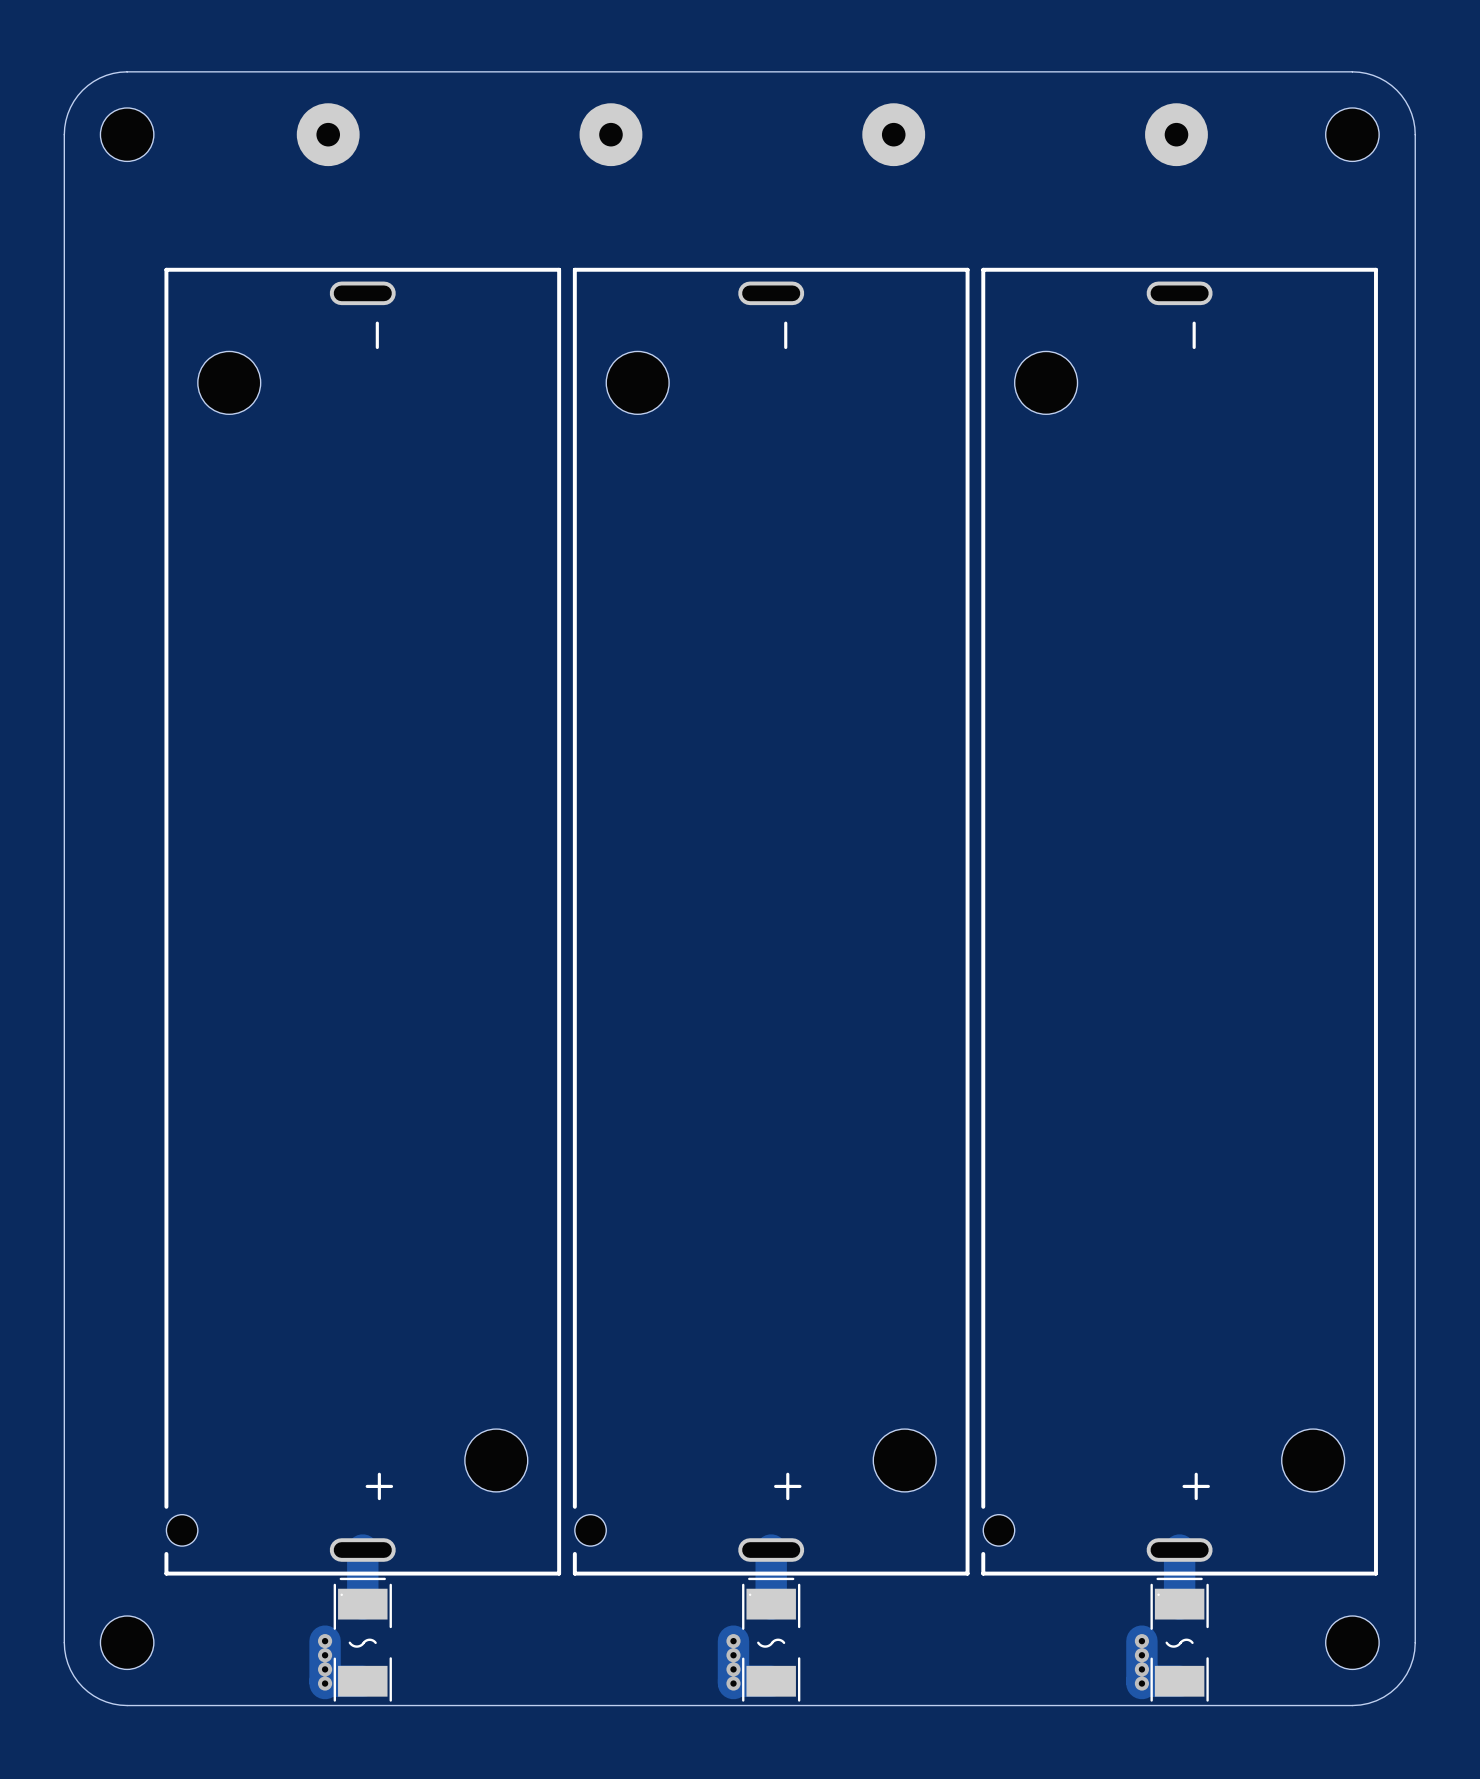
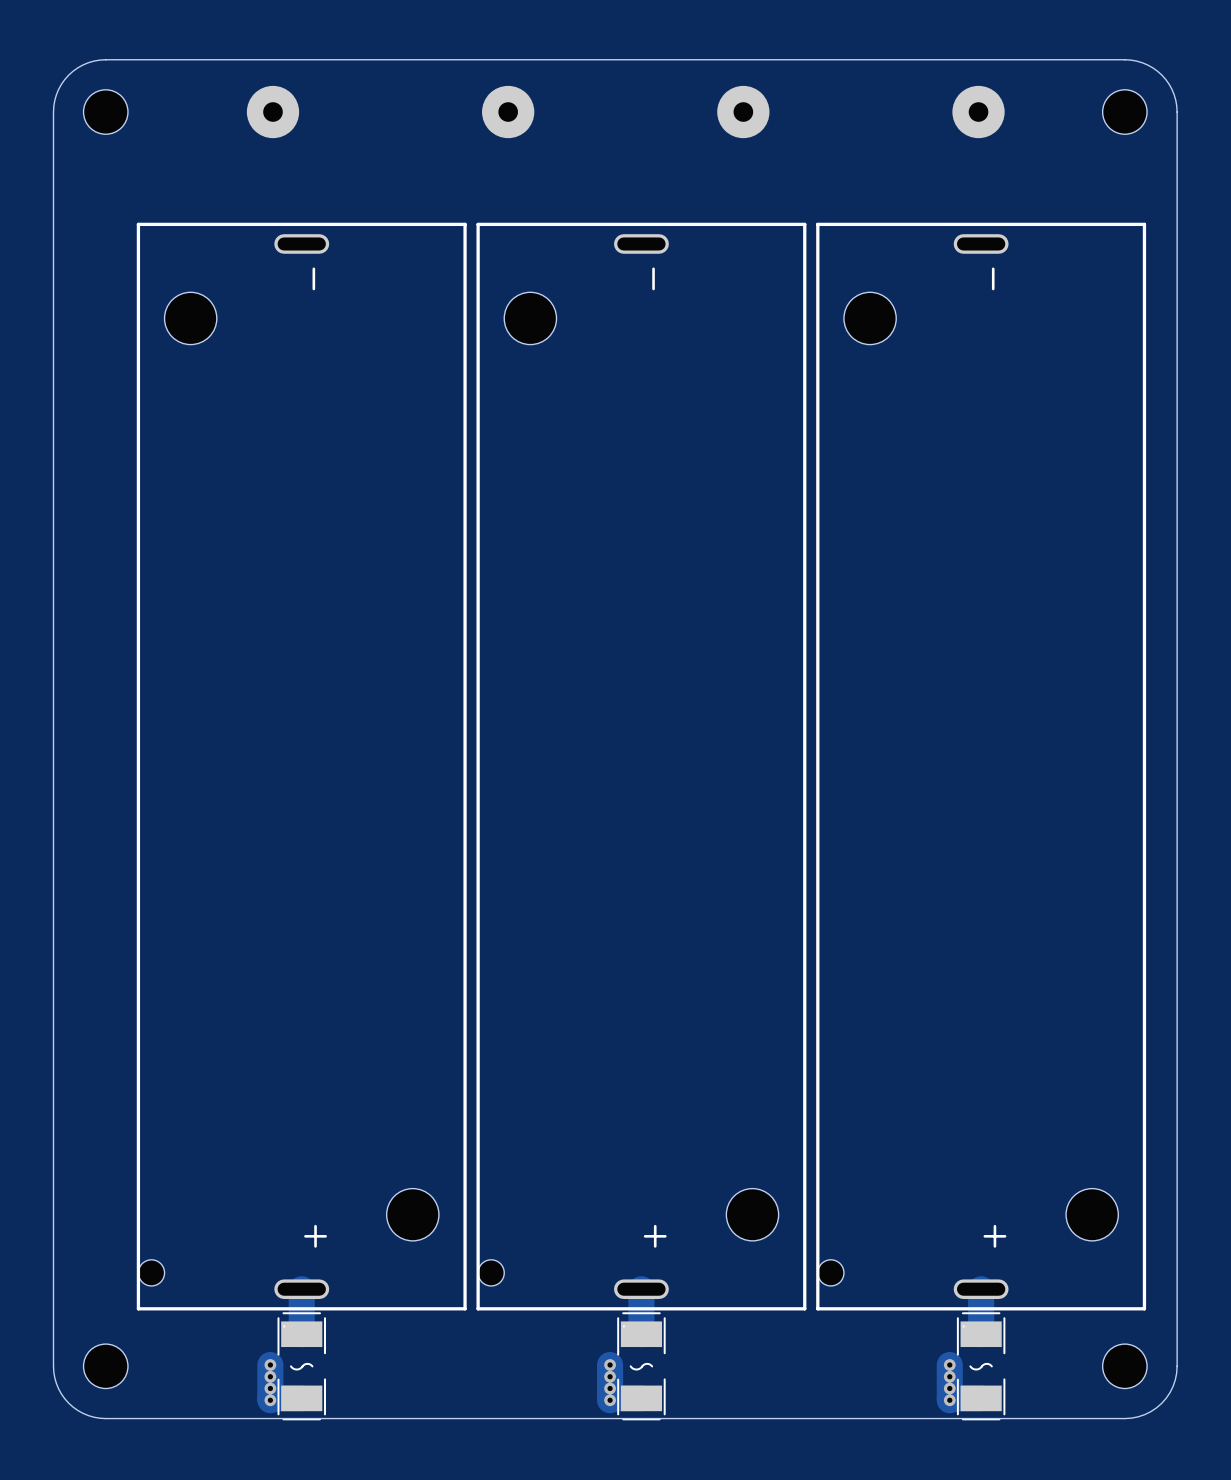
part footprint: [164, 267, 562, 1576] -> [136, 222, 467, 1311]
part footprint: [572, 267, 970, 1576] -> [476, 222, 807, 1311]
part footprint: [981, 267, 1378, 1576] -> [816, 222, 1147, 1311]
part footprint: [333, 1577, 392, 1702] -> [277, 1312, 326, 1421]
part footprint: [742, 1577, 801, 1702] -> [617, 1312, 666, 1421]
part footprint: [1150, 1577, 1209, 1702] -> [956, 1312, 1006, 1421]

